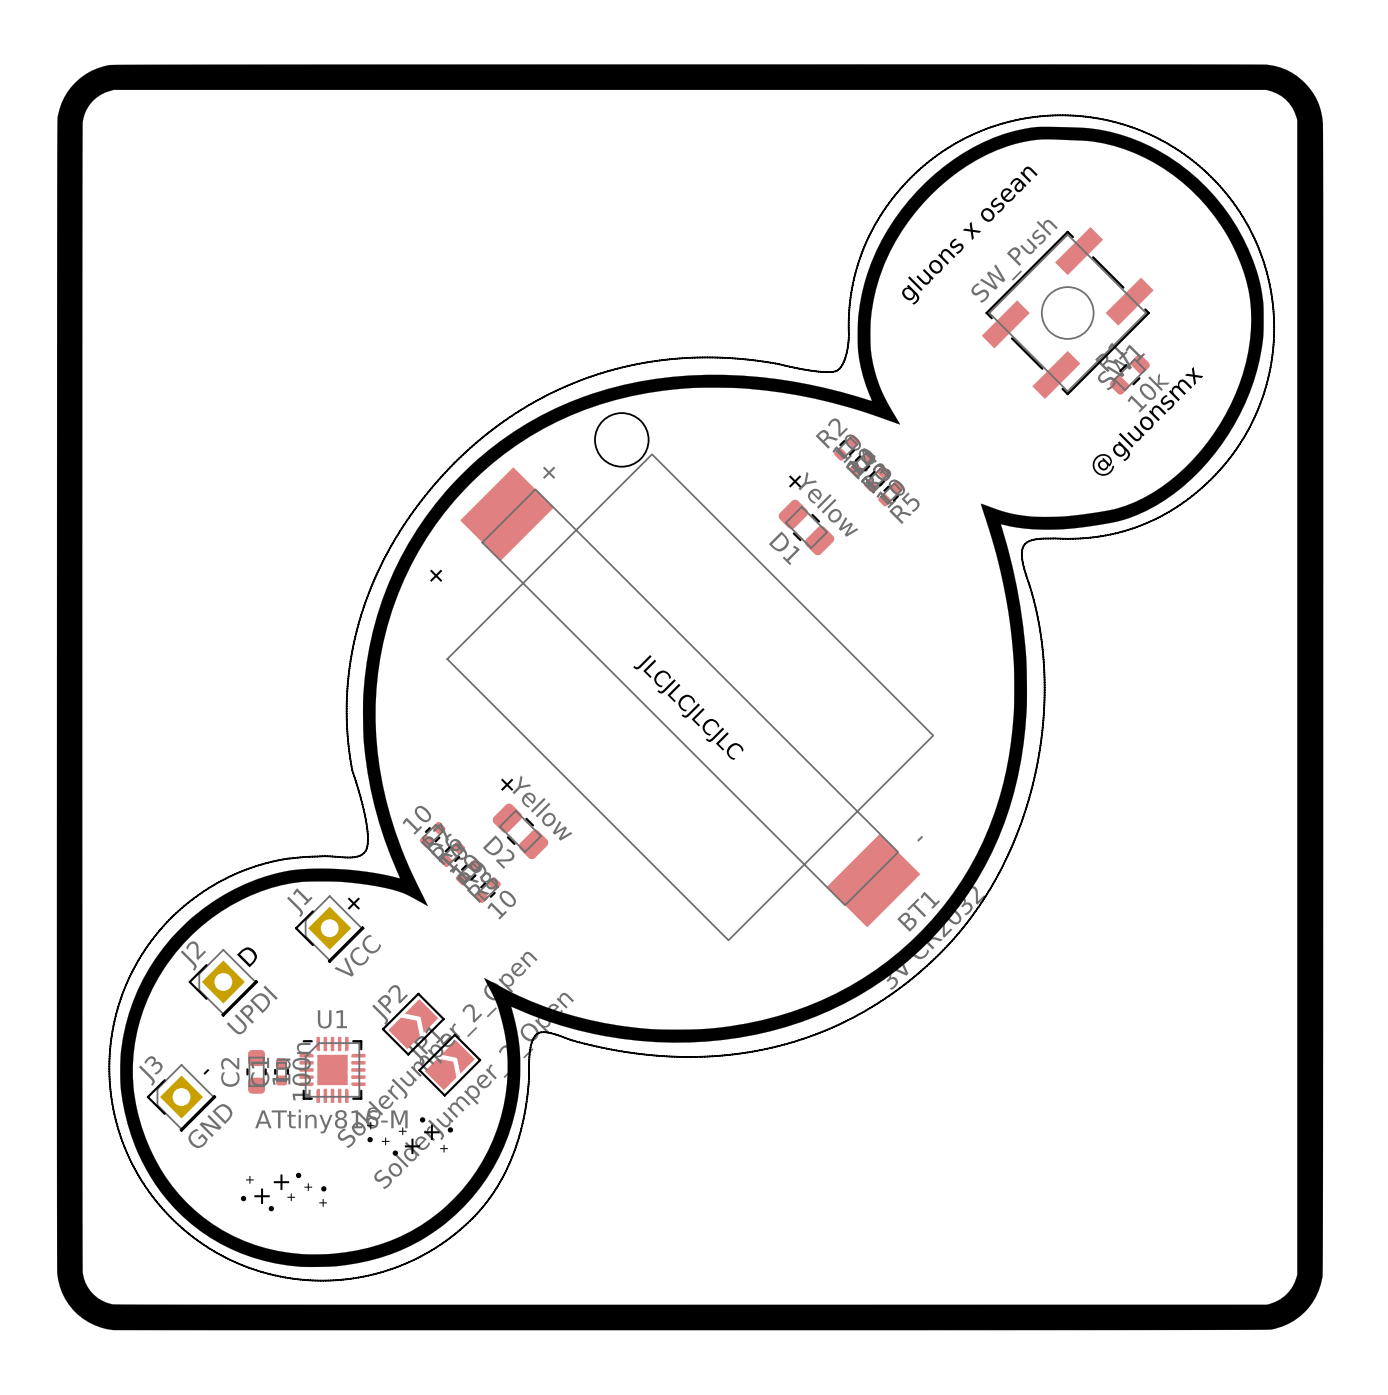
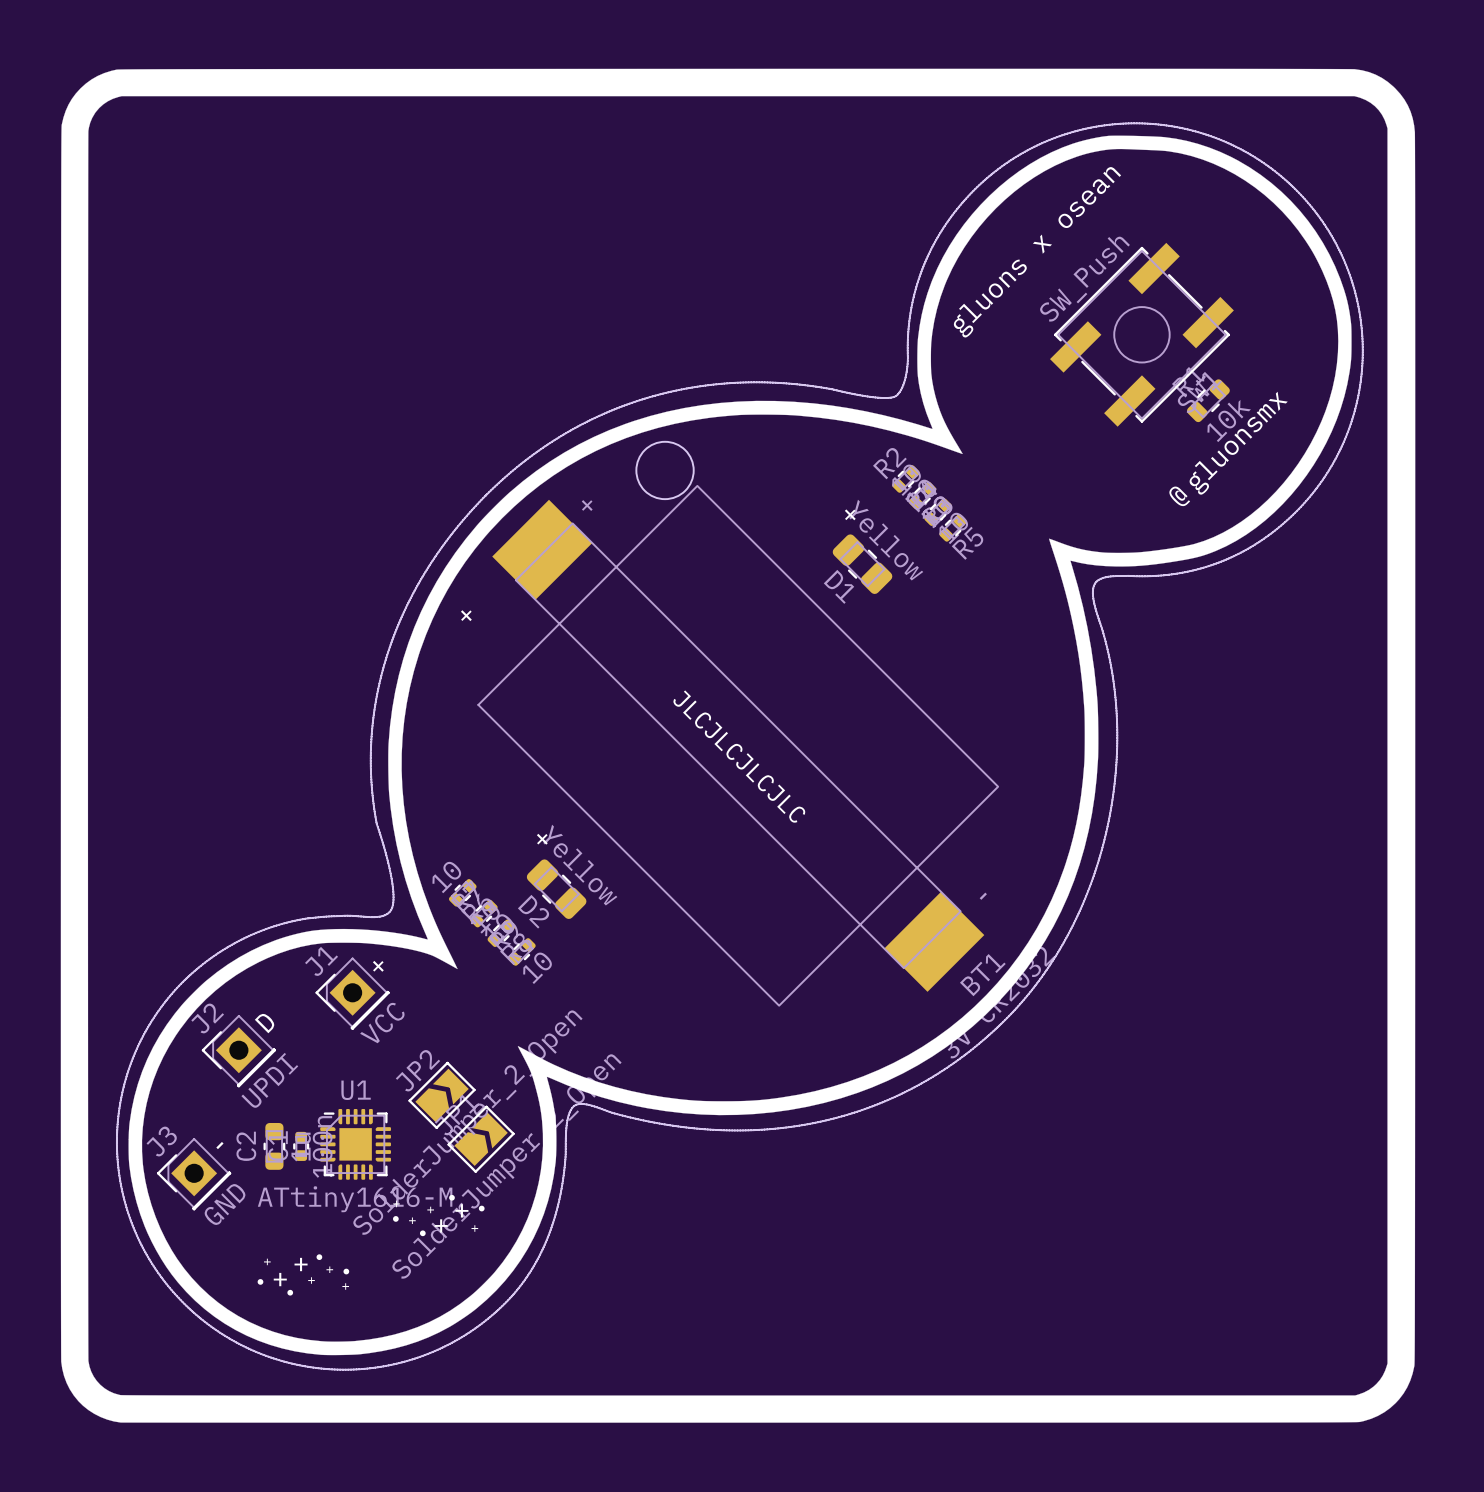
U1 value: ATtiny816-M (331, 1121) -> ATtiny1616-M (355, 1199)

